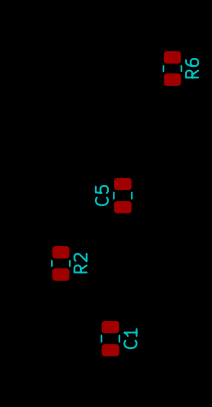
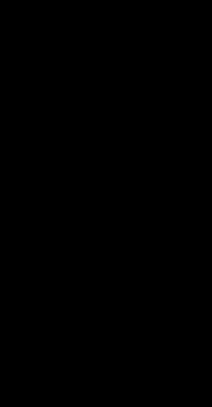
R6: (172, 68) -> none
C5: (122, 195) -> none
R2: (60, 263) -> none
C1: (110, 338) -> none

